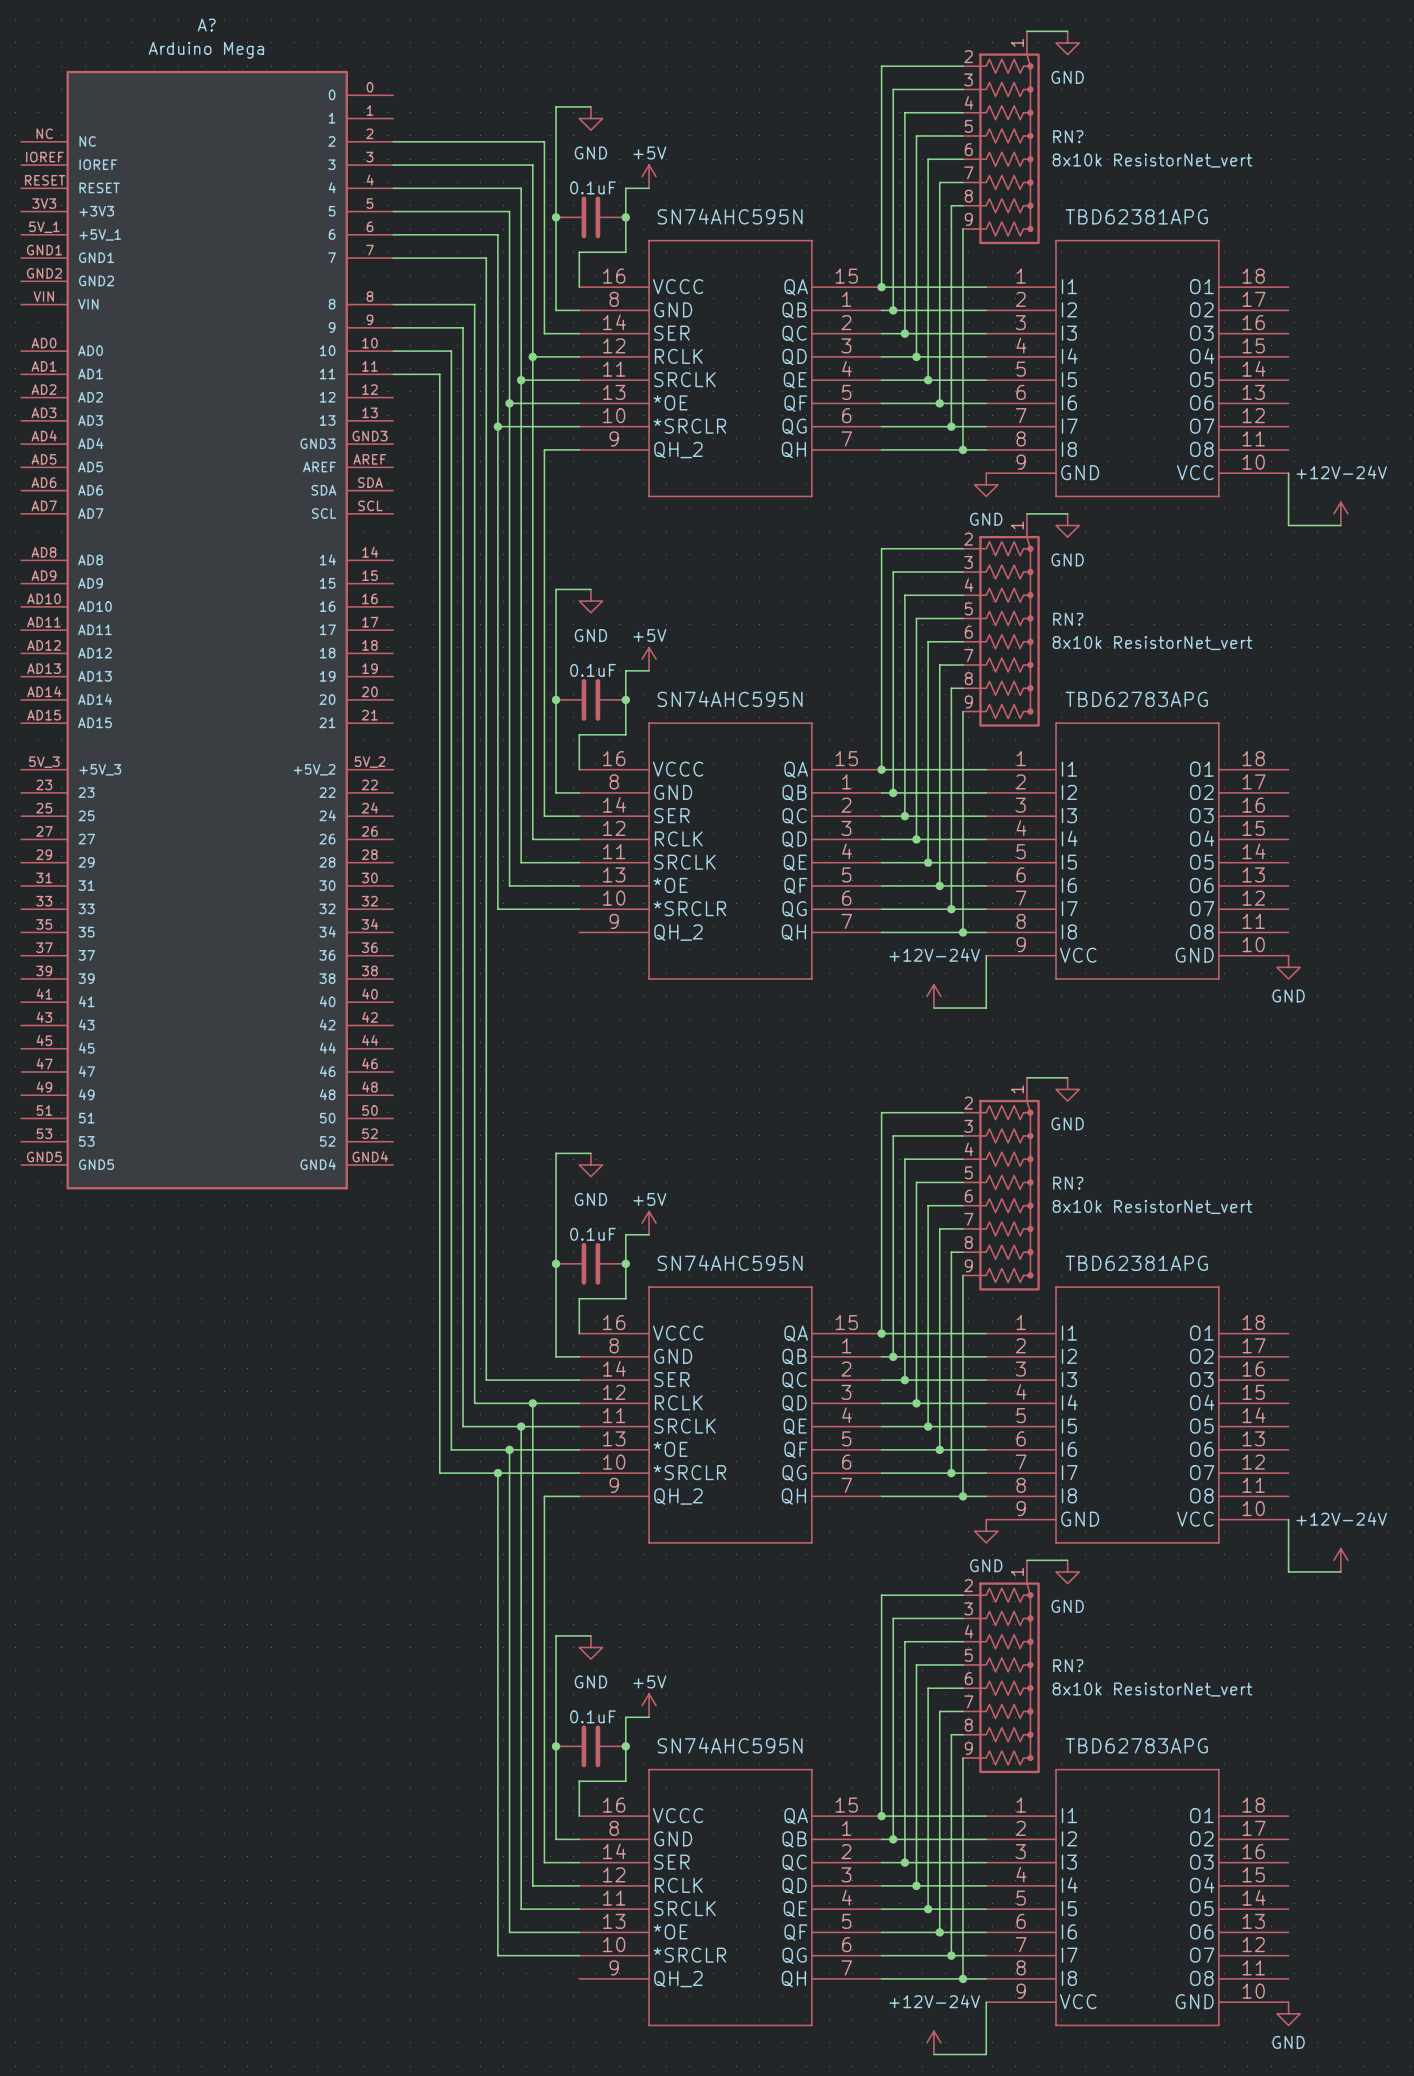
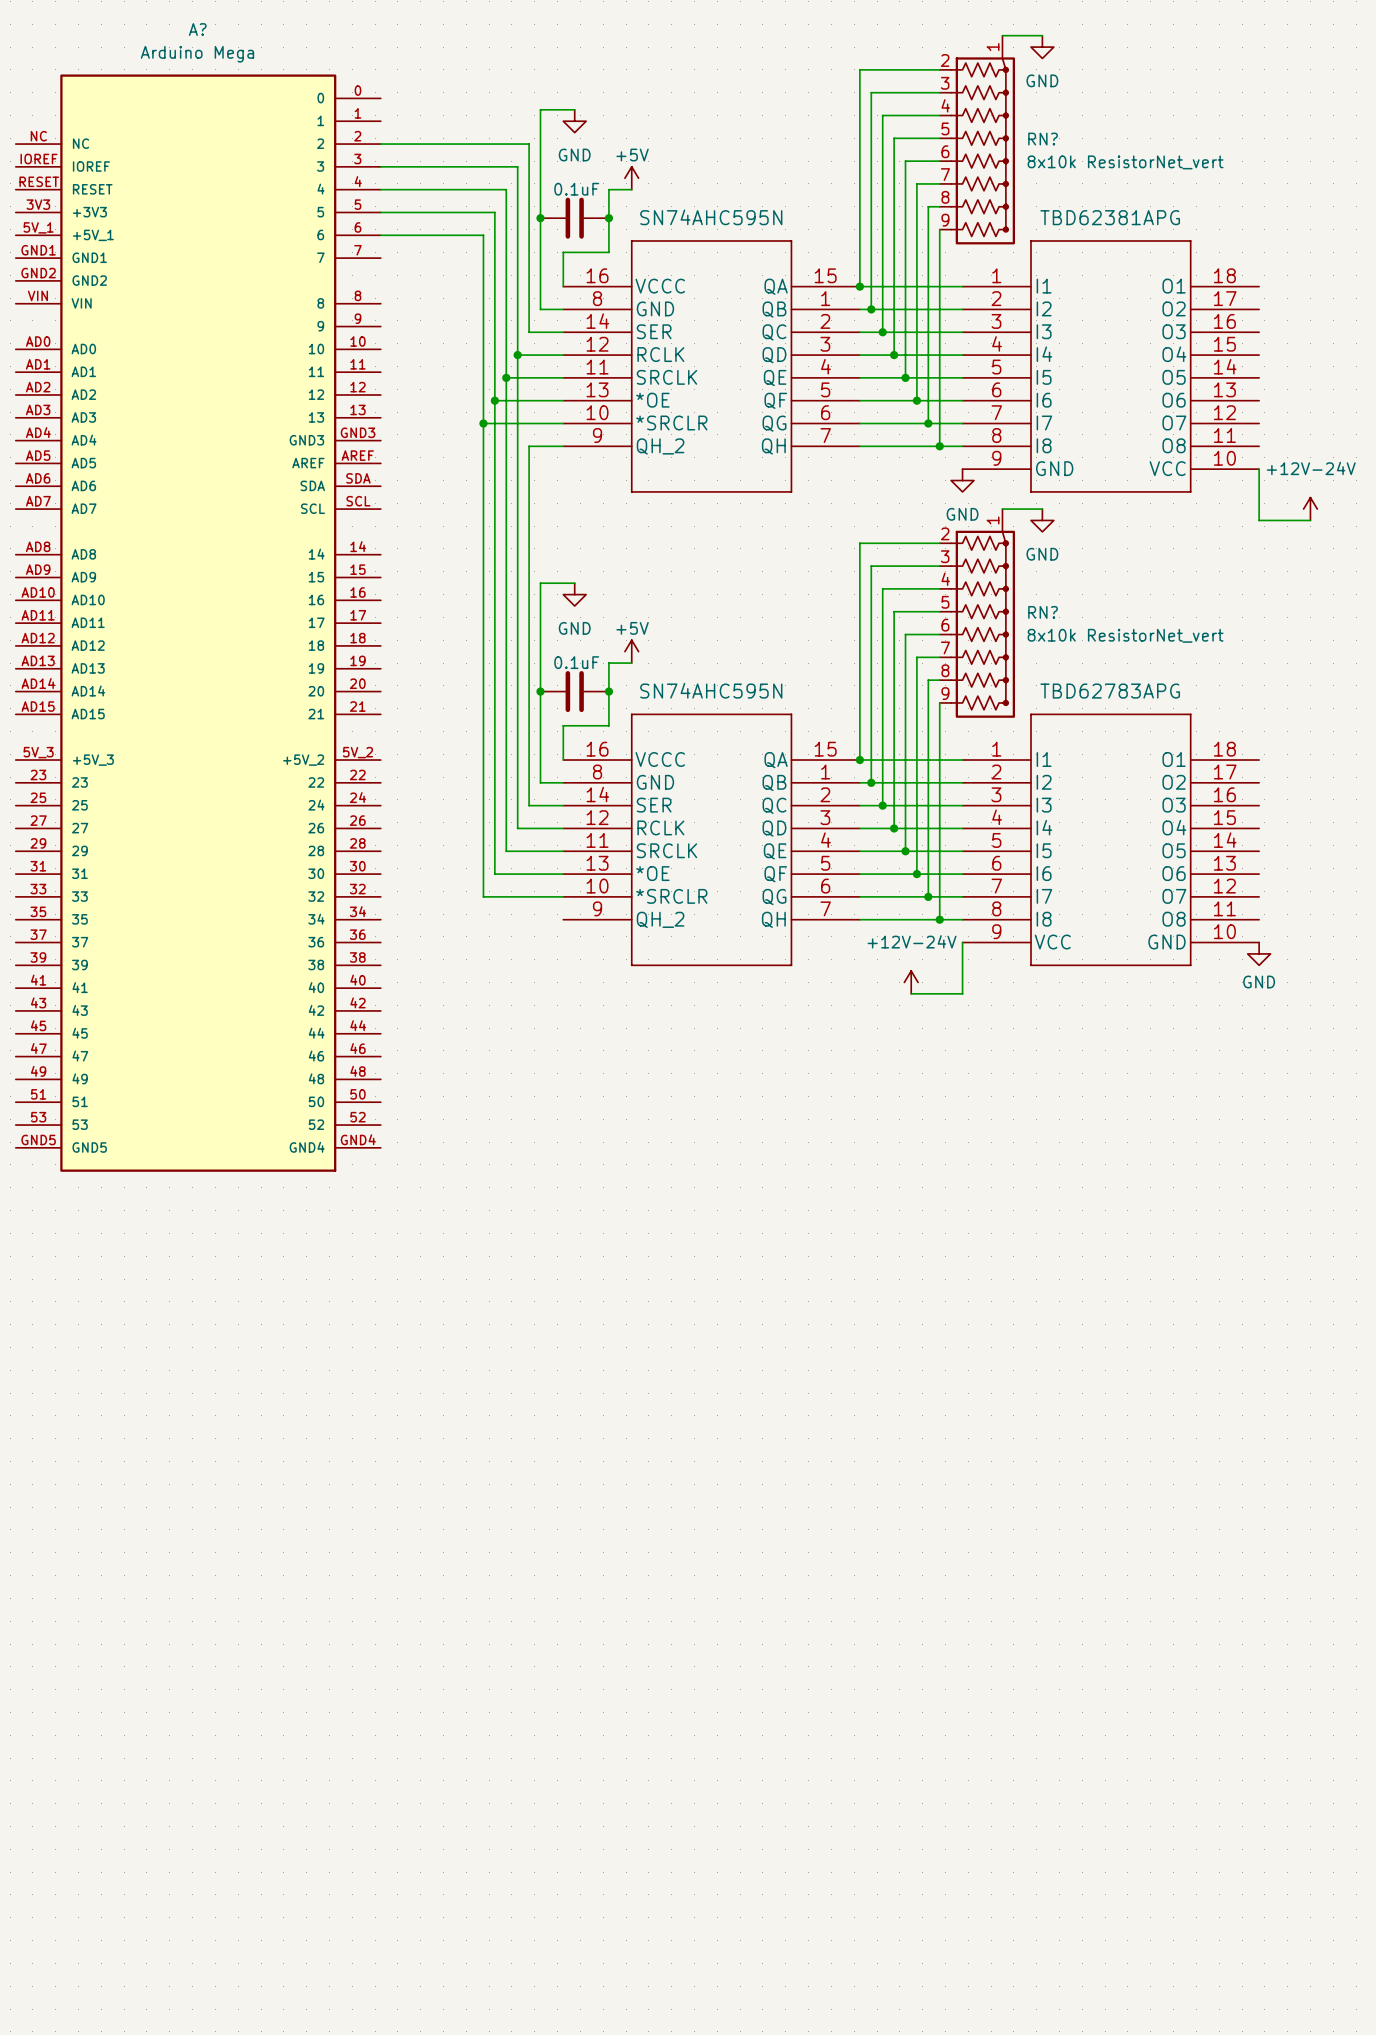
wire: (393, 258) (486, 258) (486, 1380) (579, 1380) -> none
wire: (393, 304) (474, 304) (474, 1403) (579, 1403) -> none
wire: (393, 327) (463, 327) (463, 1426) (579, 1426) -> none
wire: (393, 351) (451, 351) (451, 1449) (579, 1449) -> none
wire: (393, 374) (439, 374) (439, 1473) (579, 1473) -> none
wire: (1026, 1077) (1067, 1077) -> none
power symbol: GND (1067, 1089) -> none
wire: (963, 1112) (881, 1112) (881, 1333) (986, 1333) -> none
wire: (963, 1135) (893, 1135) (893, 1356) -> none
wire: (590, 1153) (556, 1153) (556, 1356) (579, 1356) -> none
wire: (963, 1159) (904, 1159) (904, 1380) -> none
power symbol: GND (590, 1165) -> none
wire: (963, 1182) (916, 1182) (916, 1403) -> none
RN?: 8x10k ResistorNet_vert (1001, 1184) -> none
wire: (963, 1205) (928, 1205) (928, 1426) -> none
power symbol: +5V (649, 1223) -> none
wire: (963, 1228) (939, 1228) (939, 1449) -> none
wire: (649, 1234) (625, 1234) (625, 1298) (579, 1298) (579, 1333) -> none
wire: (963, 1252) (951, 1252) (951, 1473) -> none
junction: (556, 1263) -> none
part: 0.1uF (590, 1263) -> none
junction: (625, 1263) -> none
wire: (963, 1275) (963, 1496) -> none
junction: (881, 1333) -> none
wire: (881, 1356) (986, 1356) -> none
junction: (893, 1356) -> none
wire: (881, 1380) (986, 1380) -> none
junction: (904, 1380) -> none
wire: (532, 1403) (532, 1885) (579, 1885) -> none
junction: (532, 1403) -> none
wire: (881, 1403) (986, 1403) -> none
junction: (916, 1403) -> none
part: SN74AHC595N (730, 1414) -> none
part: TBD62381APG (1137, 1414) -> none
wire: (521, 1426) (521, 1909) (579, 1909) -> none
junction: (521, 1426) -> none
wire: (881, 1426) (986, 1426) -> none
junction: (928, 1426) -> none
wire: (509, 1449) (509, 1932) (579, 1932) -> none
junction: (509, 1449) -> none
wire: (881, 1449) (986, 1449) -> none
junction: (939, 1449) -> none
wire: (497, 1473) (497, 1955) (579, 1955) -> none
junction: (497, 1473) -> none
wire: (881, 1473) (986, 1473) -> none
junction: (951, 1473) -> none
wire: (579, 1496) (544, 1496) (544, 1862) (579, 1862) -> none
wire: (881, 1496) (986, 1496) -> none
junction: (963, 1496) -> none
wire: (1288, 1519) (1288, 1571) (1340, 1571) -> none
power symbol: GND (986, 1531) -> none
wire: (1026, 1560) (1067, 1560) -> none
power symbol: +12V-24V (1340, 1560) -> none
power symbol: GND (1067, 1571) -> none
wire: (963, 1595) (881, 1595) (881, 1816) (986, 1816) -> none
wire: (963, 1618) (893, 1618) (893, 1839) -> none
wire: (590, 1635) (556, 1635) (556, 1839) (579, 1839) -> none
wire: (963, 1641) (904, 1641) (904, 1862) -> none
power symbol: GND (590, 1647) -> none
wire: (963, 1664) (916, 1664) (916, 1885) -> none
RN?: 8x10k ResistorNet_vert (1001, 1666) -> none
wire: (963, 1688) (928, 1688) (928, 1909) -> none
power symbol: +5V (649, 1705) -> none
wire: (963, 1711) (939, 1711) (939, 1932) -> none
wire: (649, 1717) (625, 1717) (625, 1781) (579, 1781) (579, 1816) -> none
wire: (963, 1734) (951, 1734) (951, 1955) -> none
junction: (556, 1746) -> none
part: 0.1uF (590, 1746) -> none
junction: (625, 1746) -> none
wire: (963, 1757) (963, 1978) -> none
junction: (881, 1816) -> none
wire: (881, 1839) (986, 1839) -> none
junction: (893, 1839) -> none
wire: (881, 1862) (986, 1862) -> none
junction: (904, 1862) -> none
wire: (881, 1885) (986, 1885) -> none
junction: (916, 1885) -> none
part: SN74AHC595N (730, 1897) -> none
part: TBD62783APG (1137, 1897) -> none
wire: (881, 1909) (986, 1909) -> none
junction: (928, 1909) -> none
wire: (881, 1932) (986, 1932) -> none
junction: (939, 1932) -> none
wire: (881, 1955) (986, 1955) -> none
junction: (951, 1955) -> none
wire: (881, 1978) (986, 1978) -> none
junction: (963, 1978) -> none
wire: (986, 2002) (986, 2054) (933, 2054) -> none
power symbol: GND (1288, 2013) -> none
power symbol: +12V-24V (933, 2042) -> none

